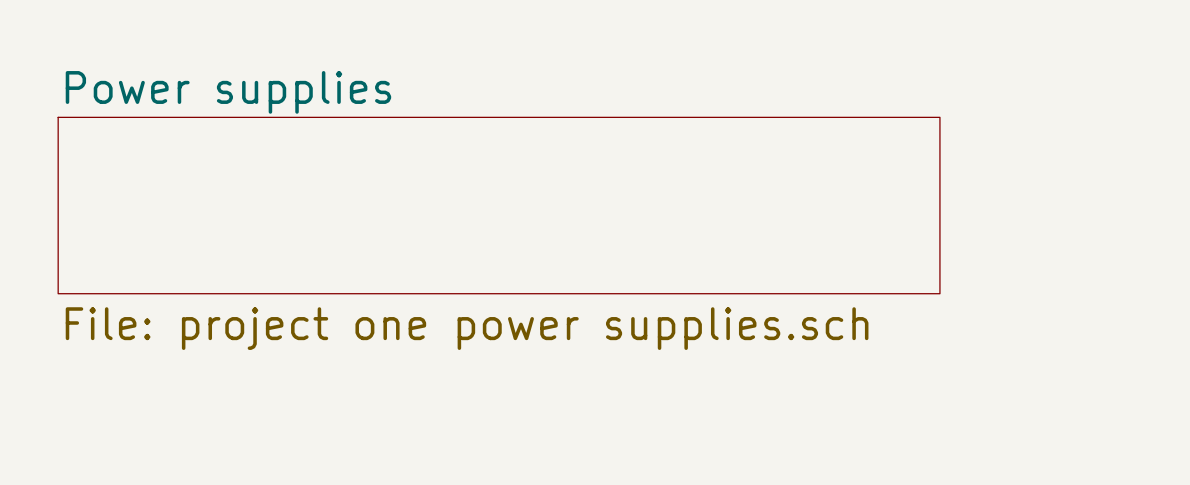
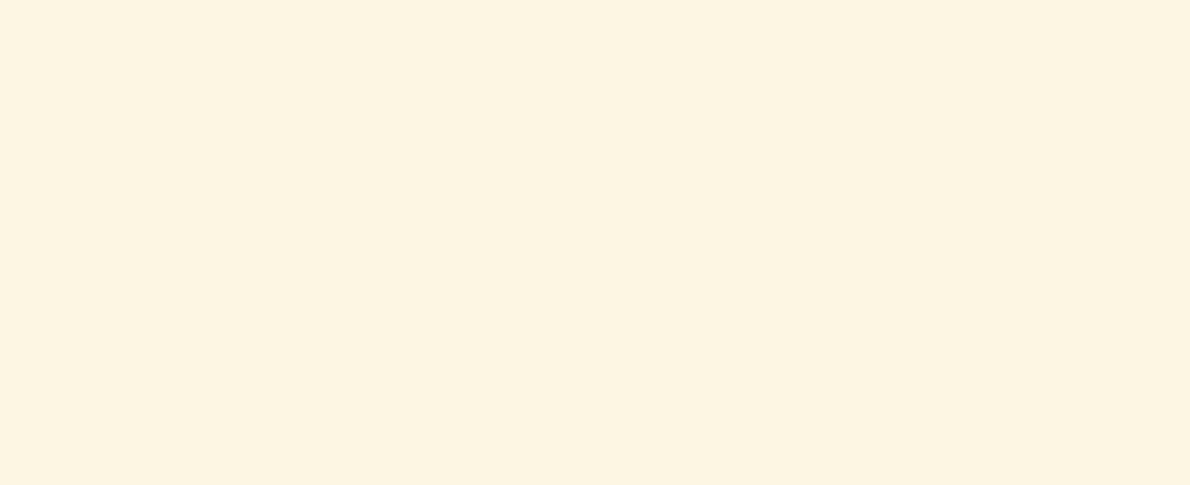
sheet Power supplies: File: project one power supplies.sch (499, 205) -> none

